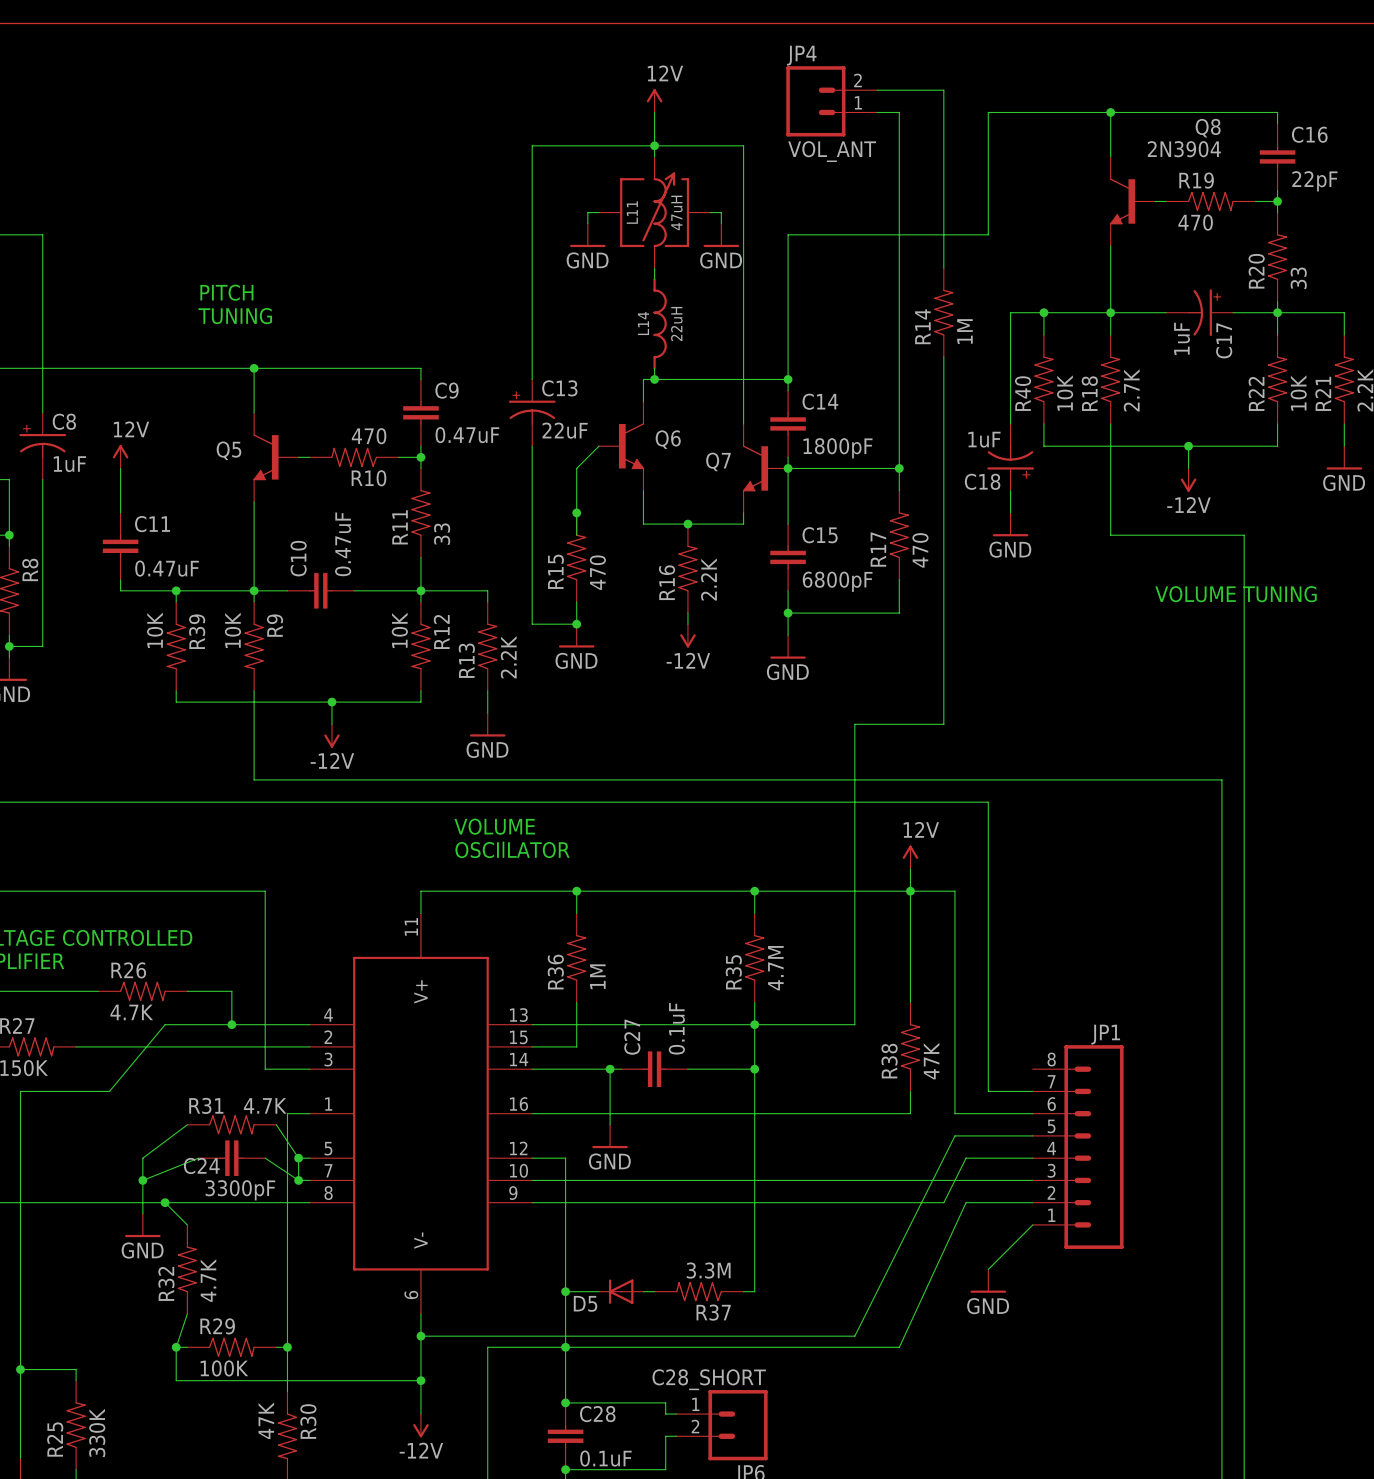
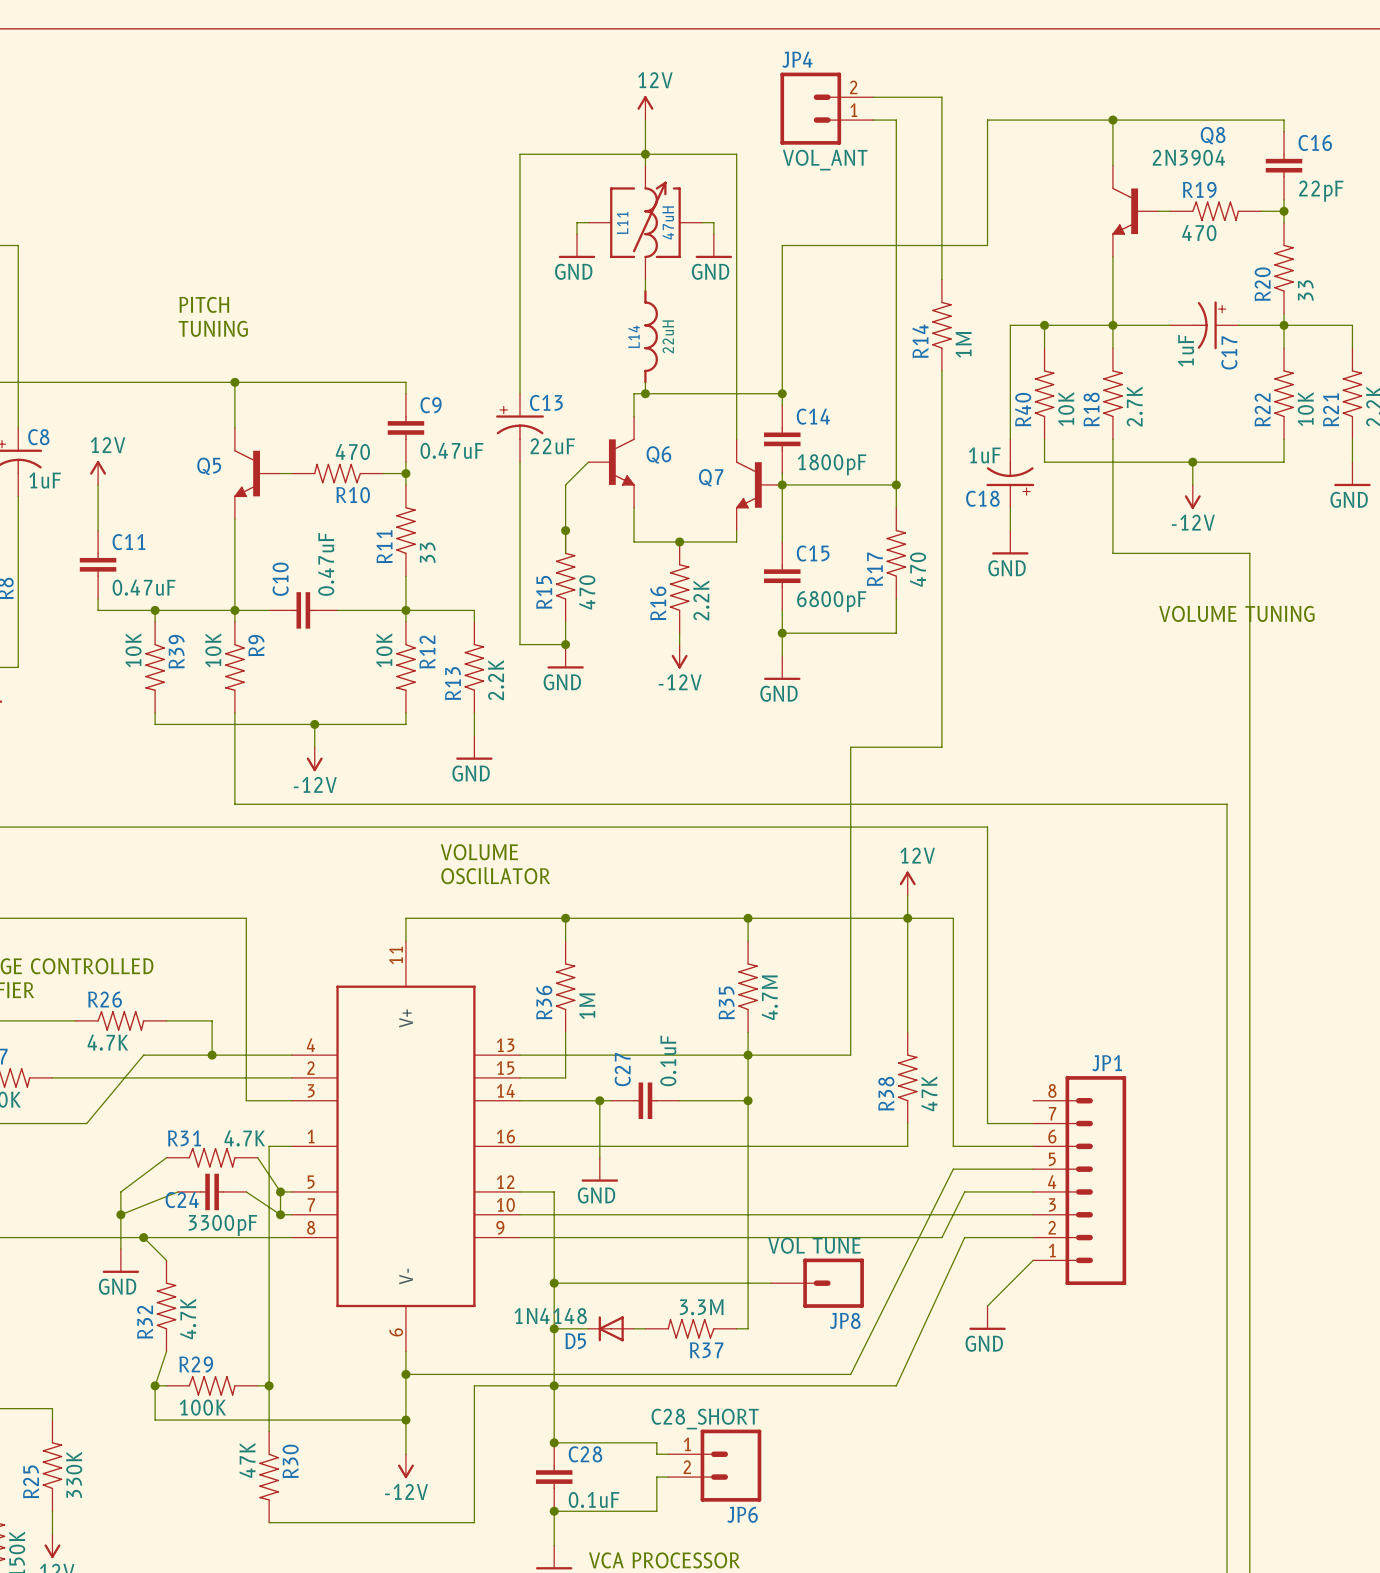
wire: none -> (554, 1283) (770, 1283)
junction: none -> (554, 1283)
JP8: none -> VOL TUNE (817, 1283)
D5 value: none -> 1N4148 (550, 1316)

